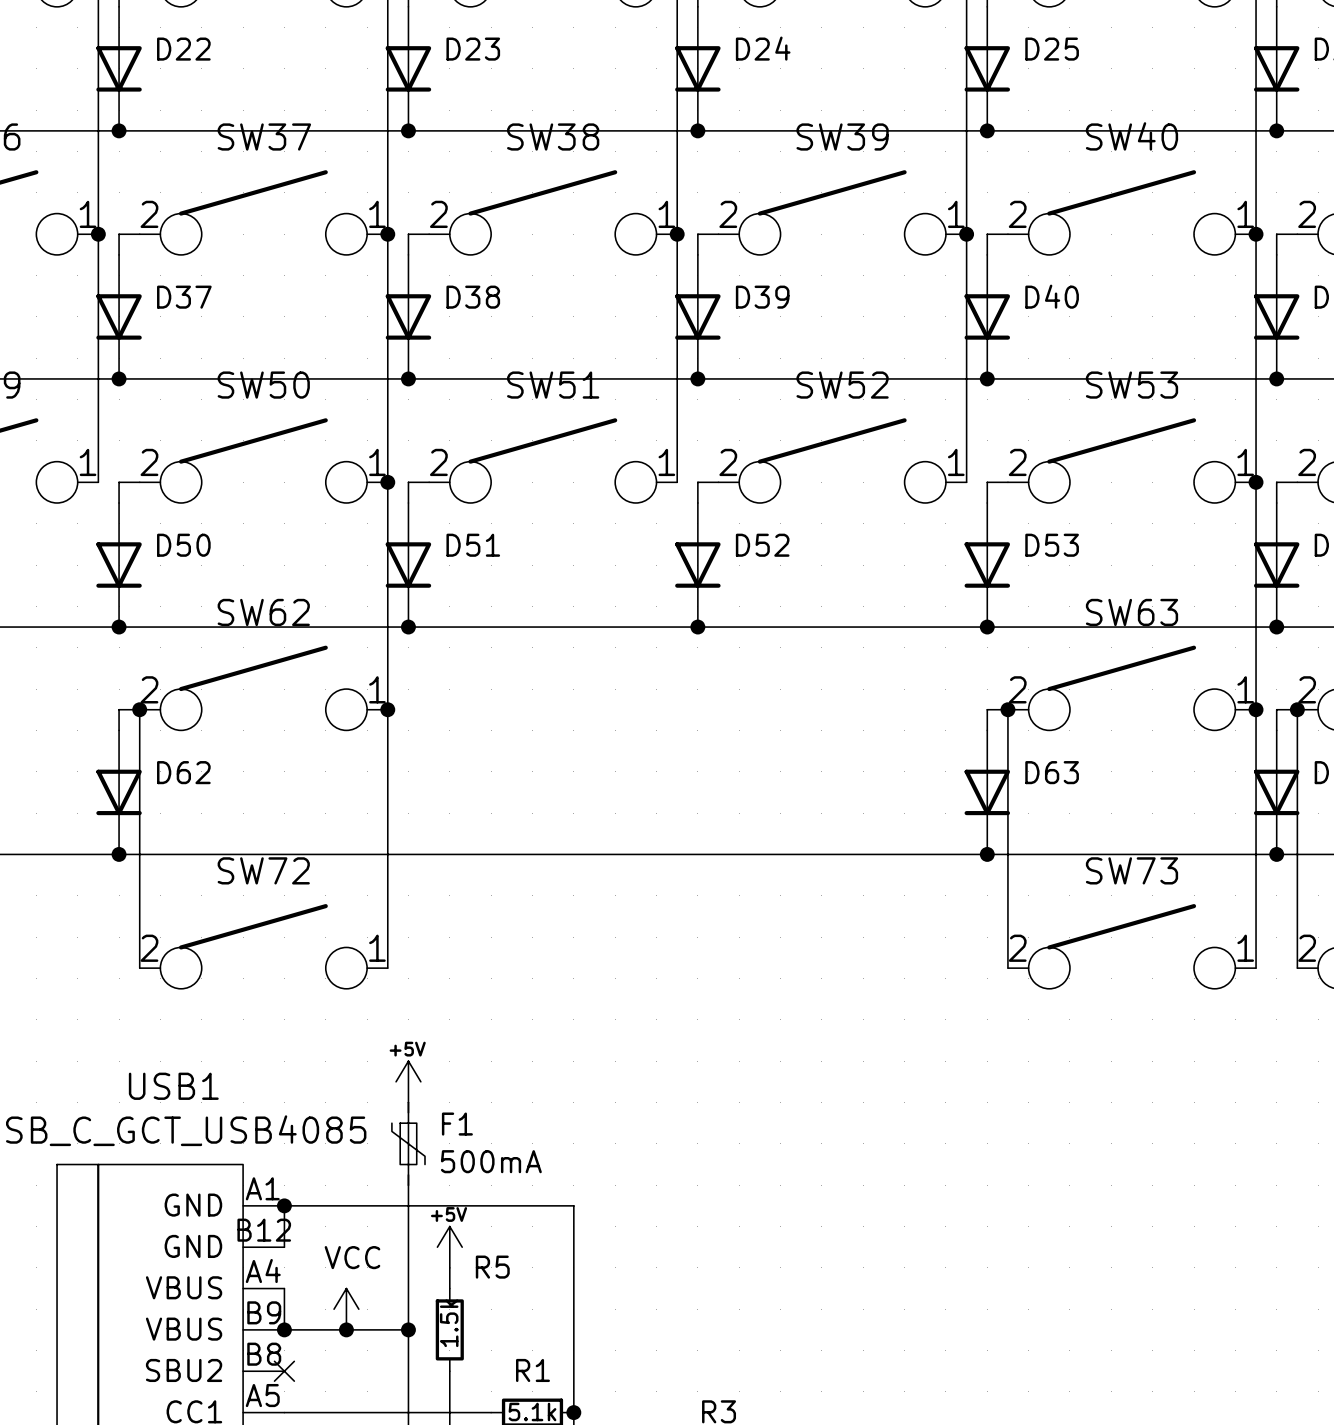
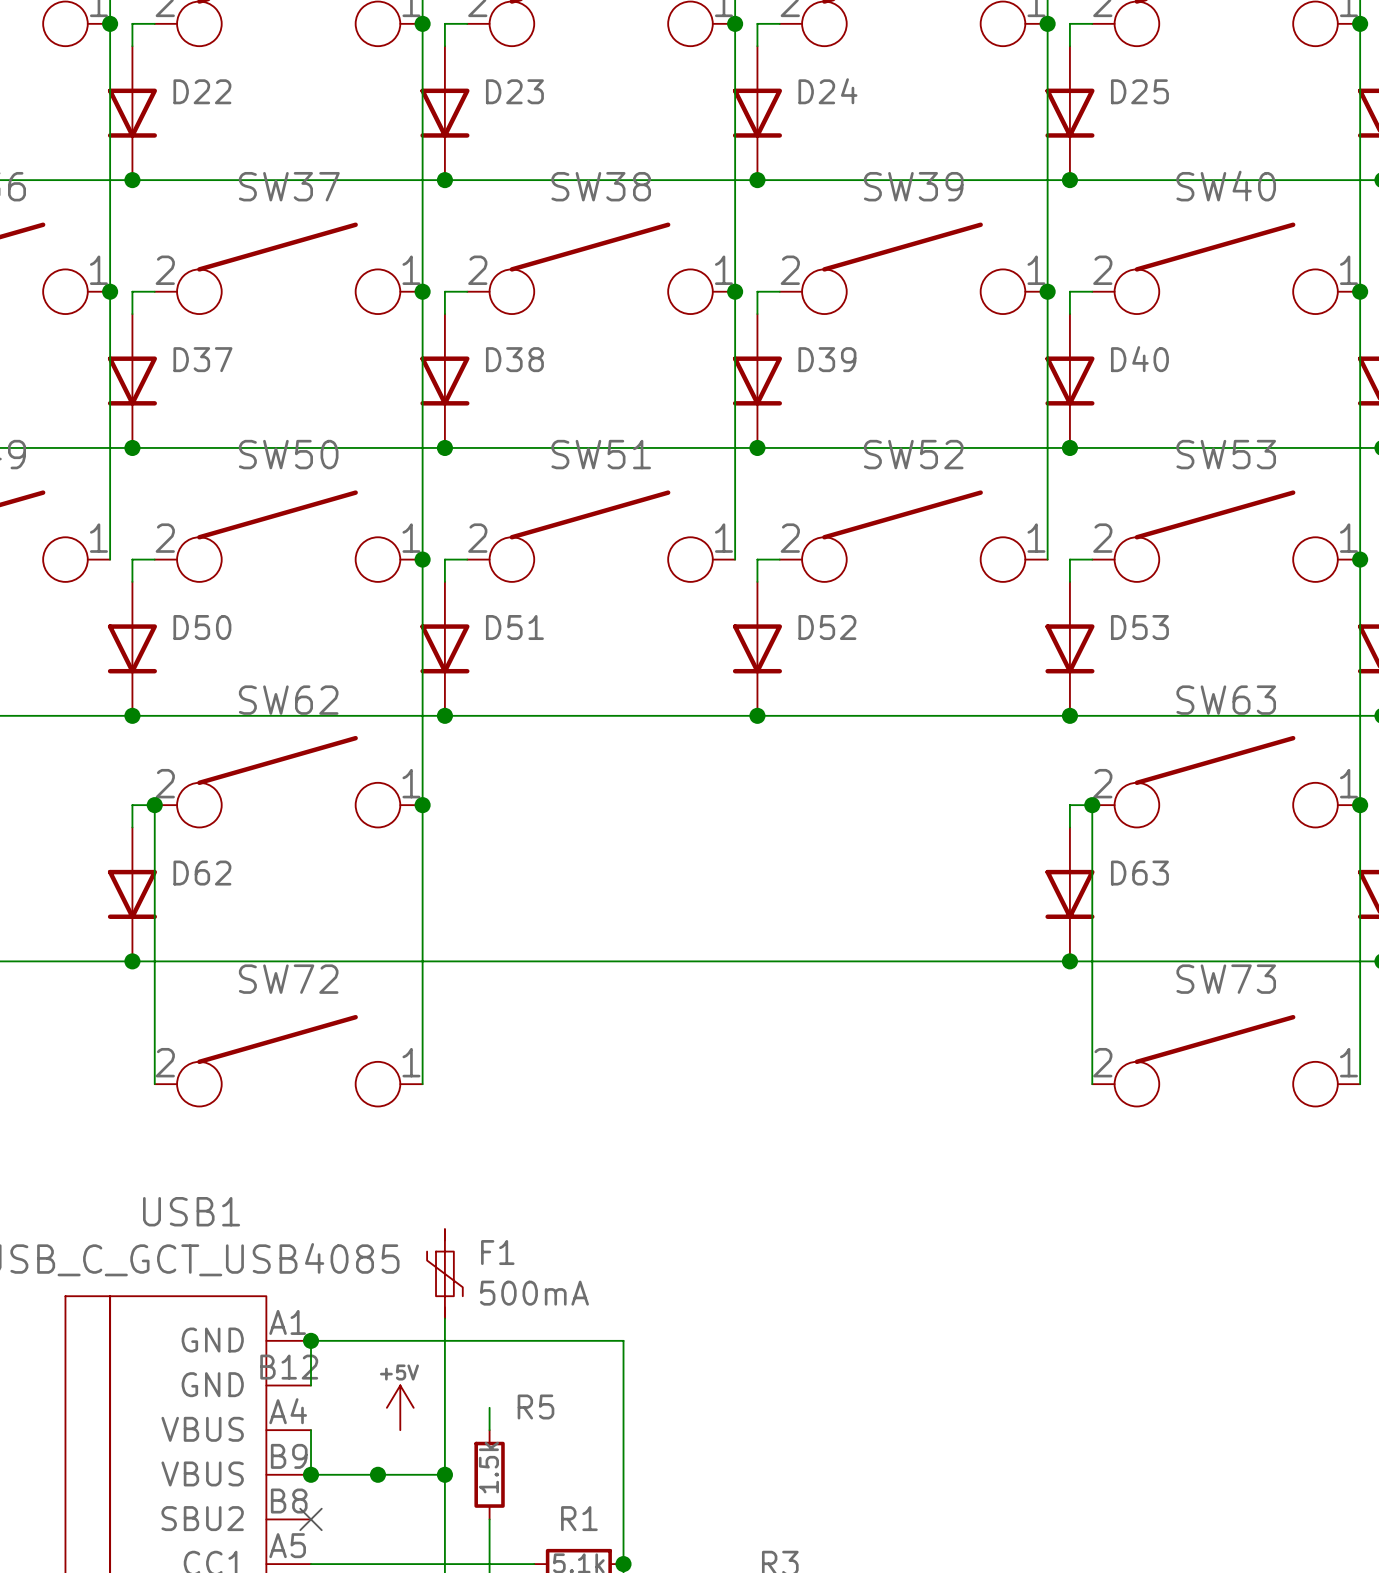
power symbol: +5V (408, 1081) -> none
power symbol position: +5V (449, 1247) -> +5V (400, 1407)
power symbol: VCC (346, 1309) -> none

